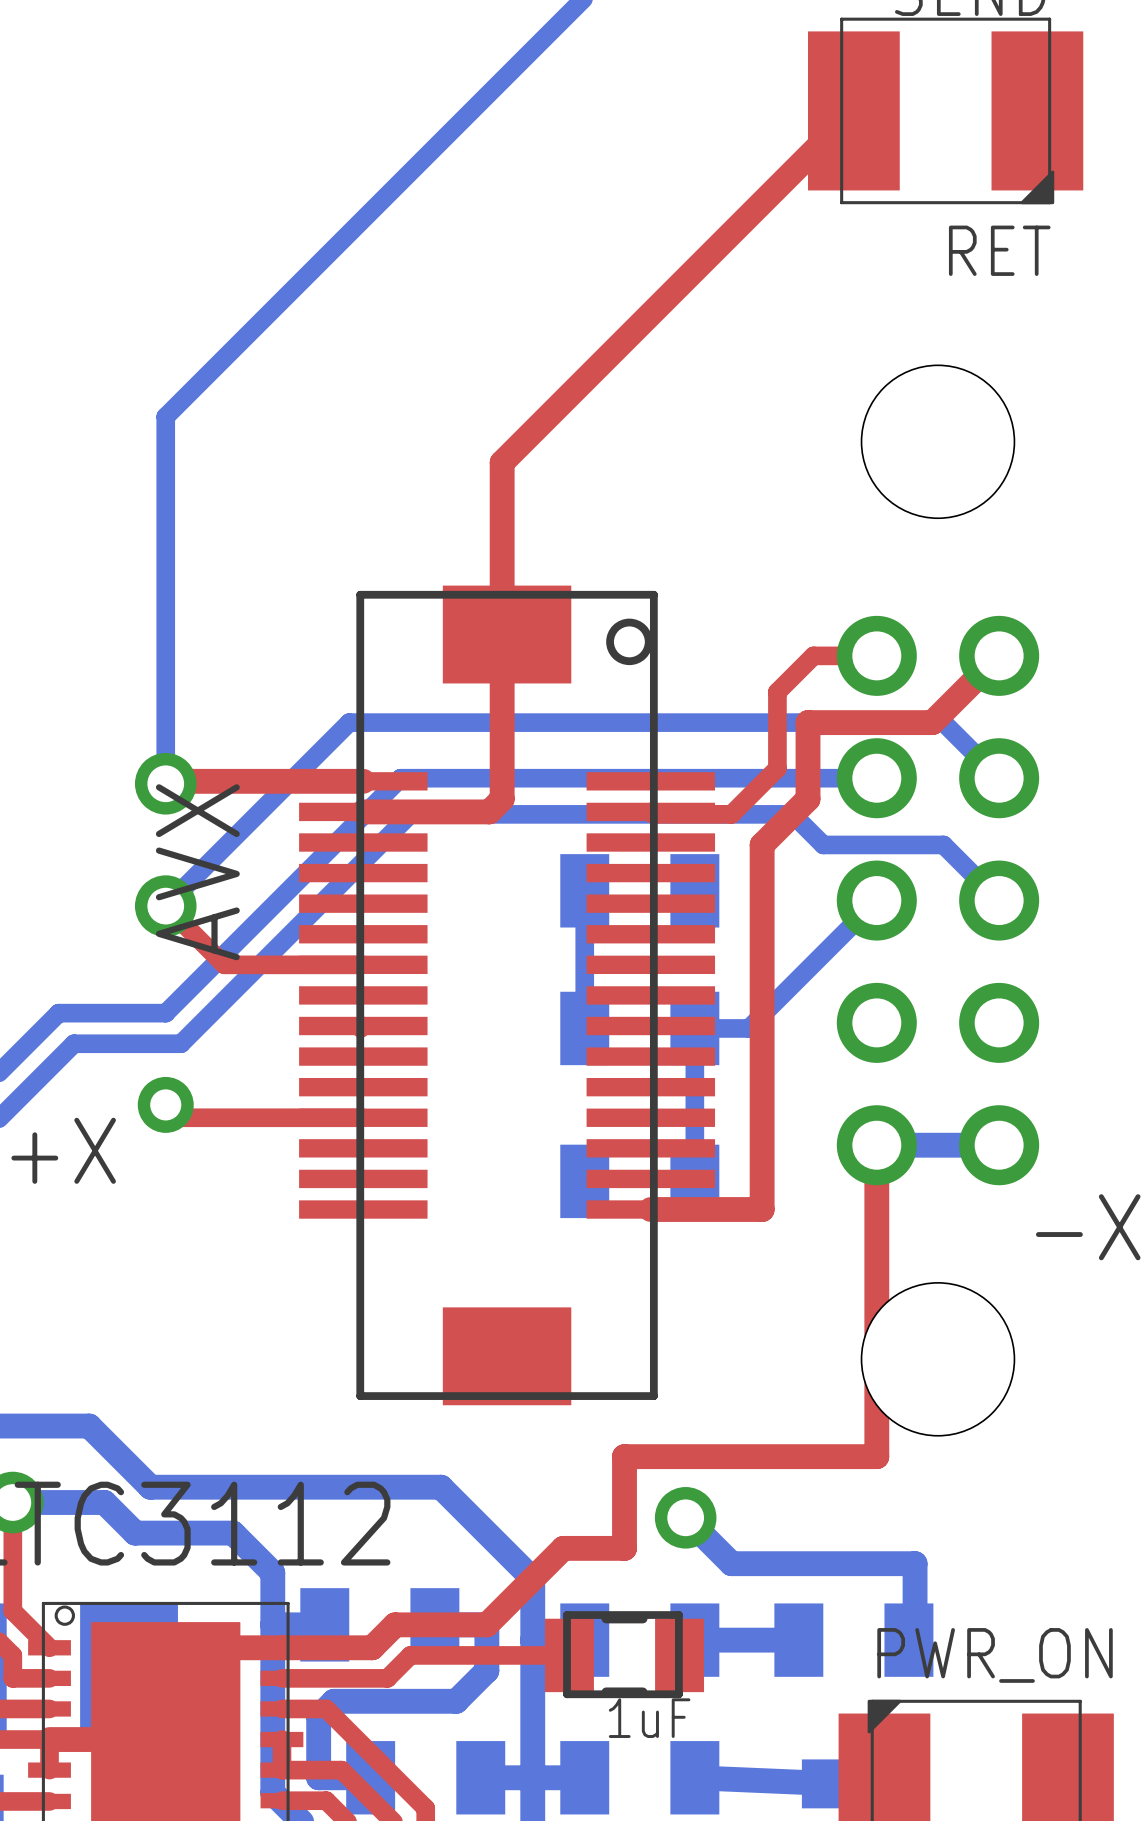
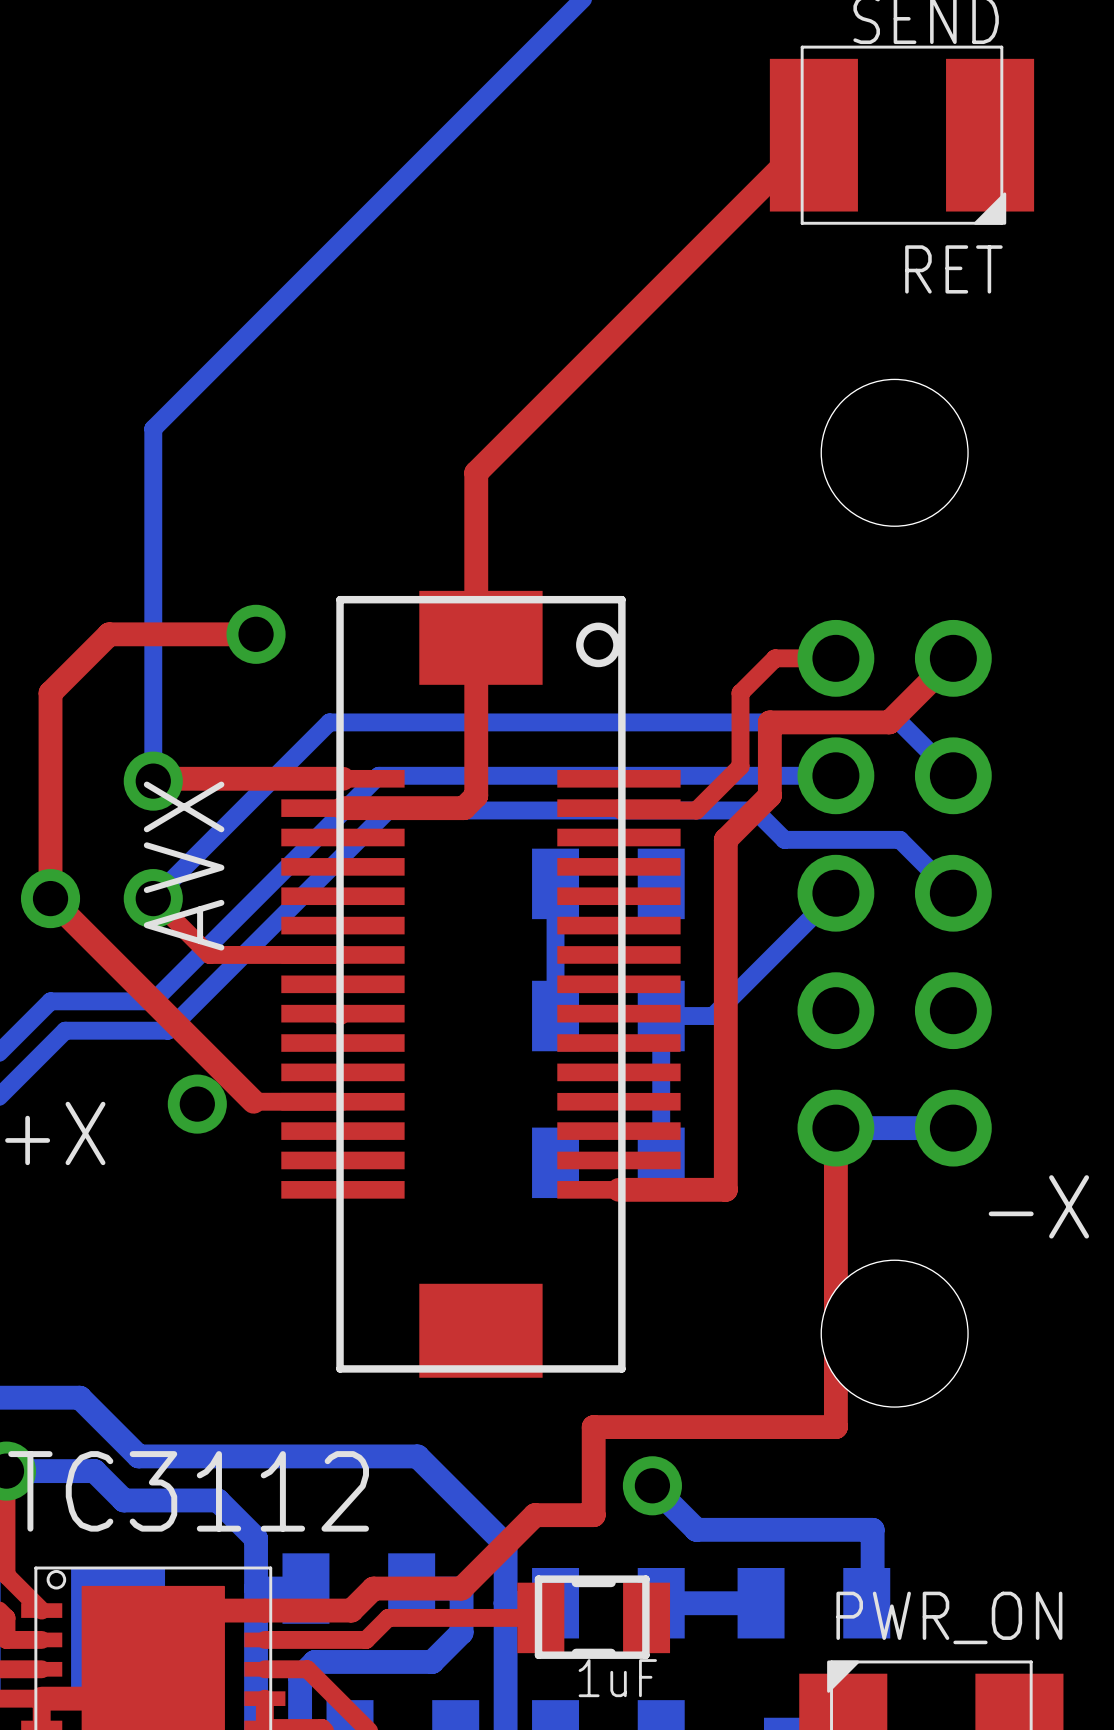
via: none -> (256, 634)
via: none -> (50, 898)
top track: (165, 1104) (178, 1117) (270, 1117) -> (256, 634) (109, 634) (50, 693) (50, 898) (253, 1101)
via position: (165, 1104) -> (197, 1104)

